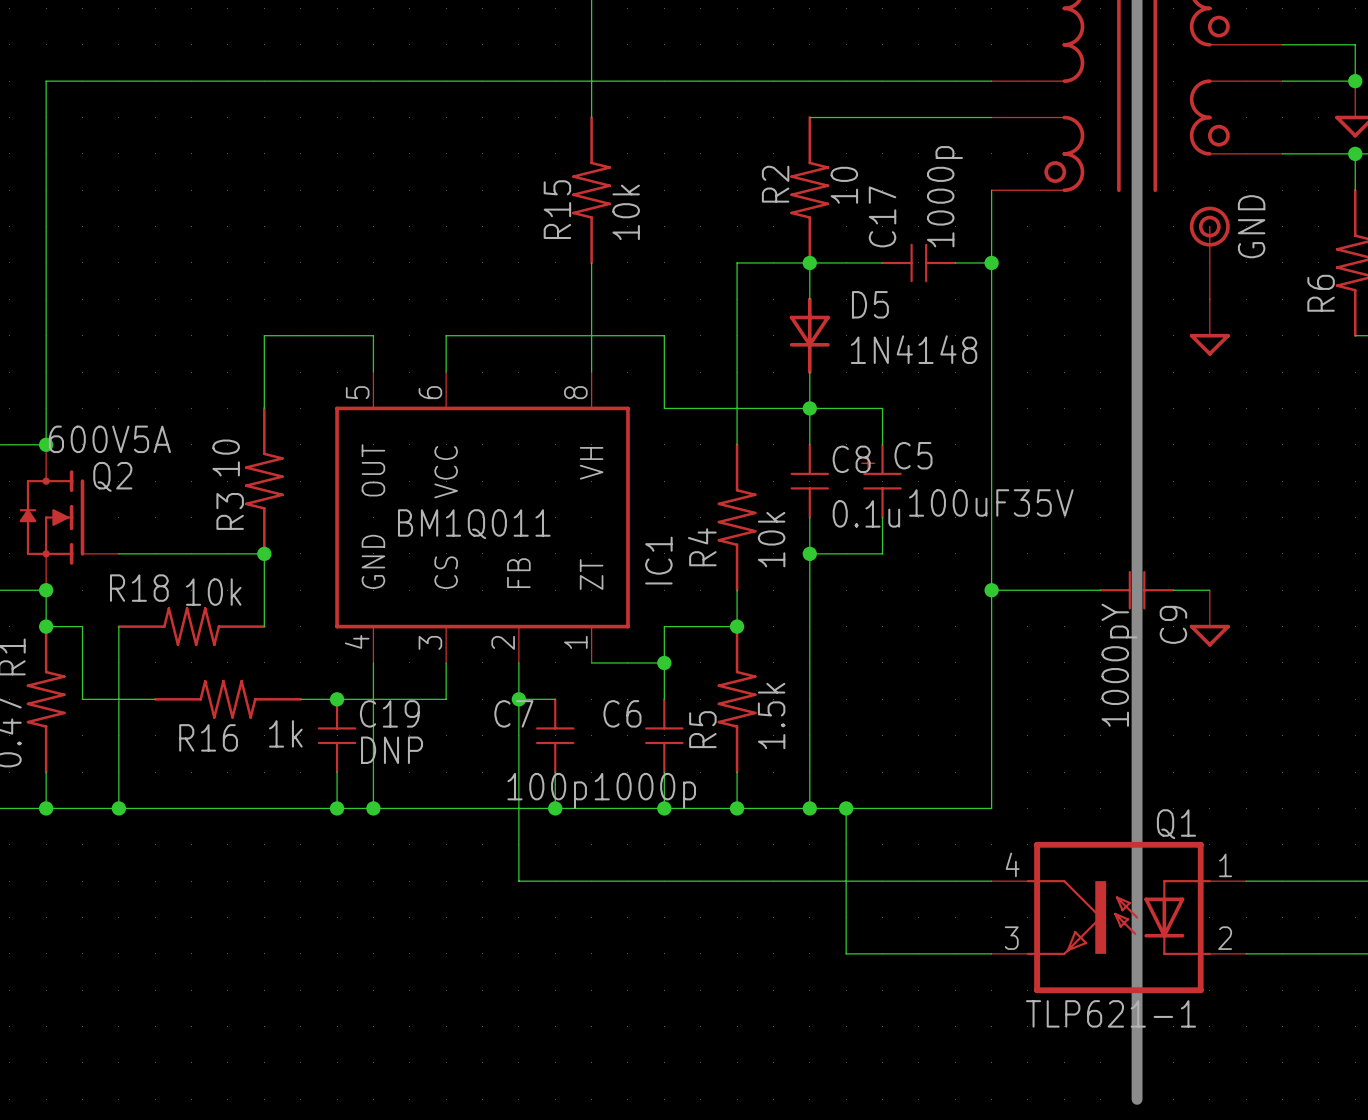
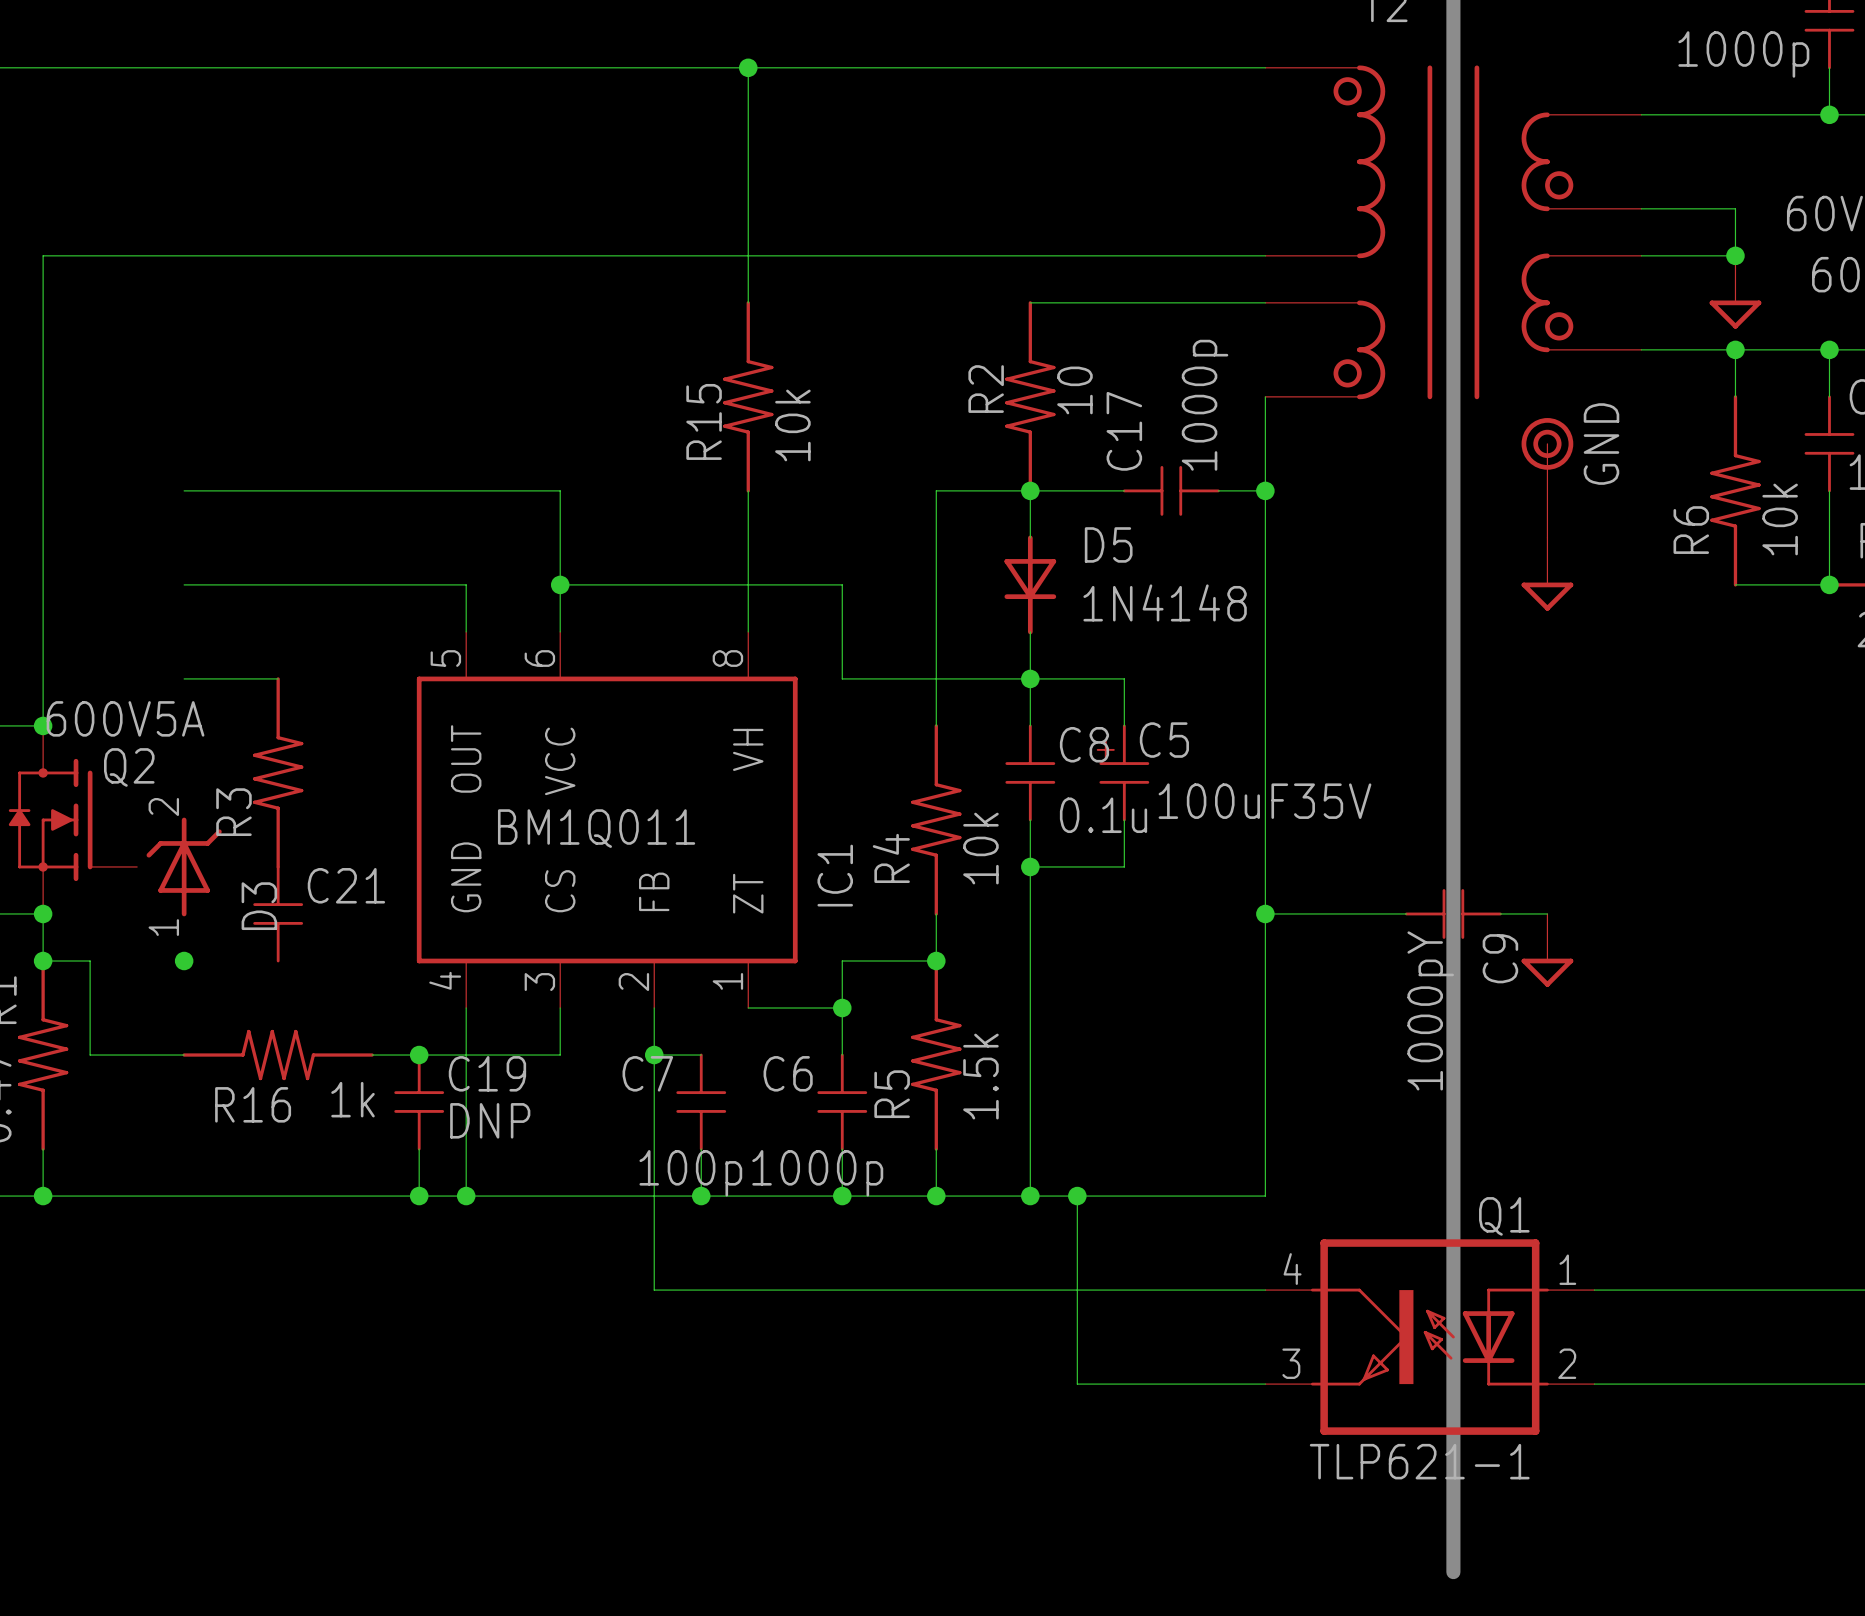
wire: none -> (184, 490) (560, 490) (560, 584)
wire: (264, 335) (264, 408) -> (325, 584) (184, 584)
junction: none -> (560, 584)
wire: none -> (184, 678) (278, 678)
R3 value: 10 (226, 458) -> none
R3 position: (264, 481) -> (278, 772)
wire: (118, 553) (264, 553) (264, 626) -> none
D3: none -> (184, 866)
junction: (264, 553) -> none
C21: none -> (278, 913)
wire: (118, 626) (118, 808) -> none
junction: none -> (184, 960)
R18: 10k (191, 626) -> none
junction: (118, 808) -> none

